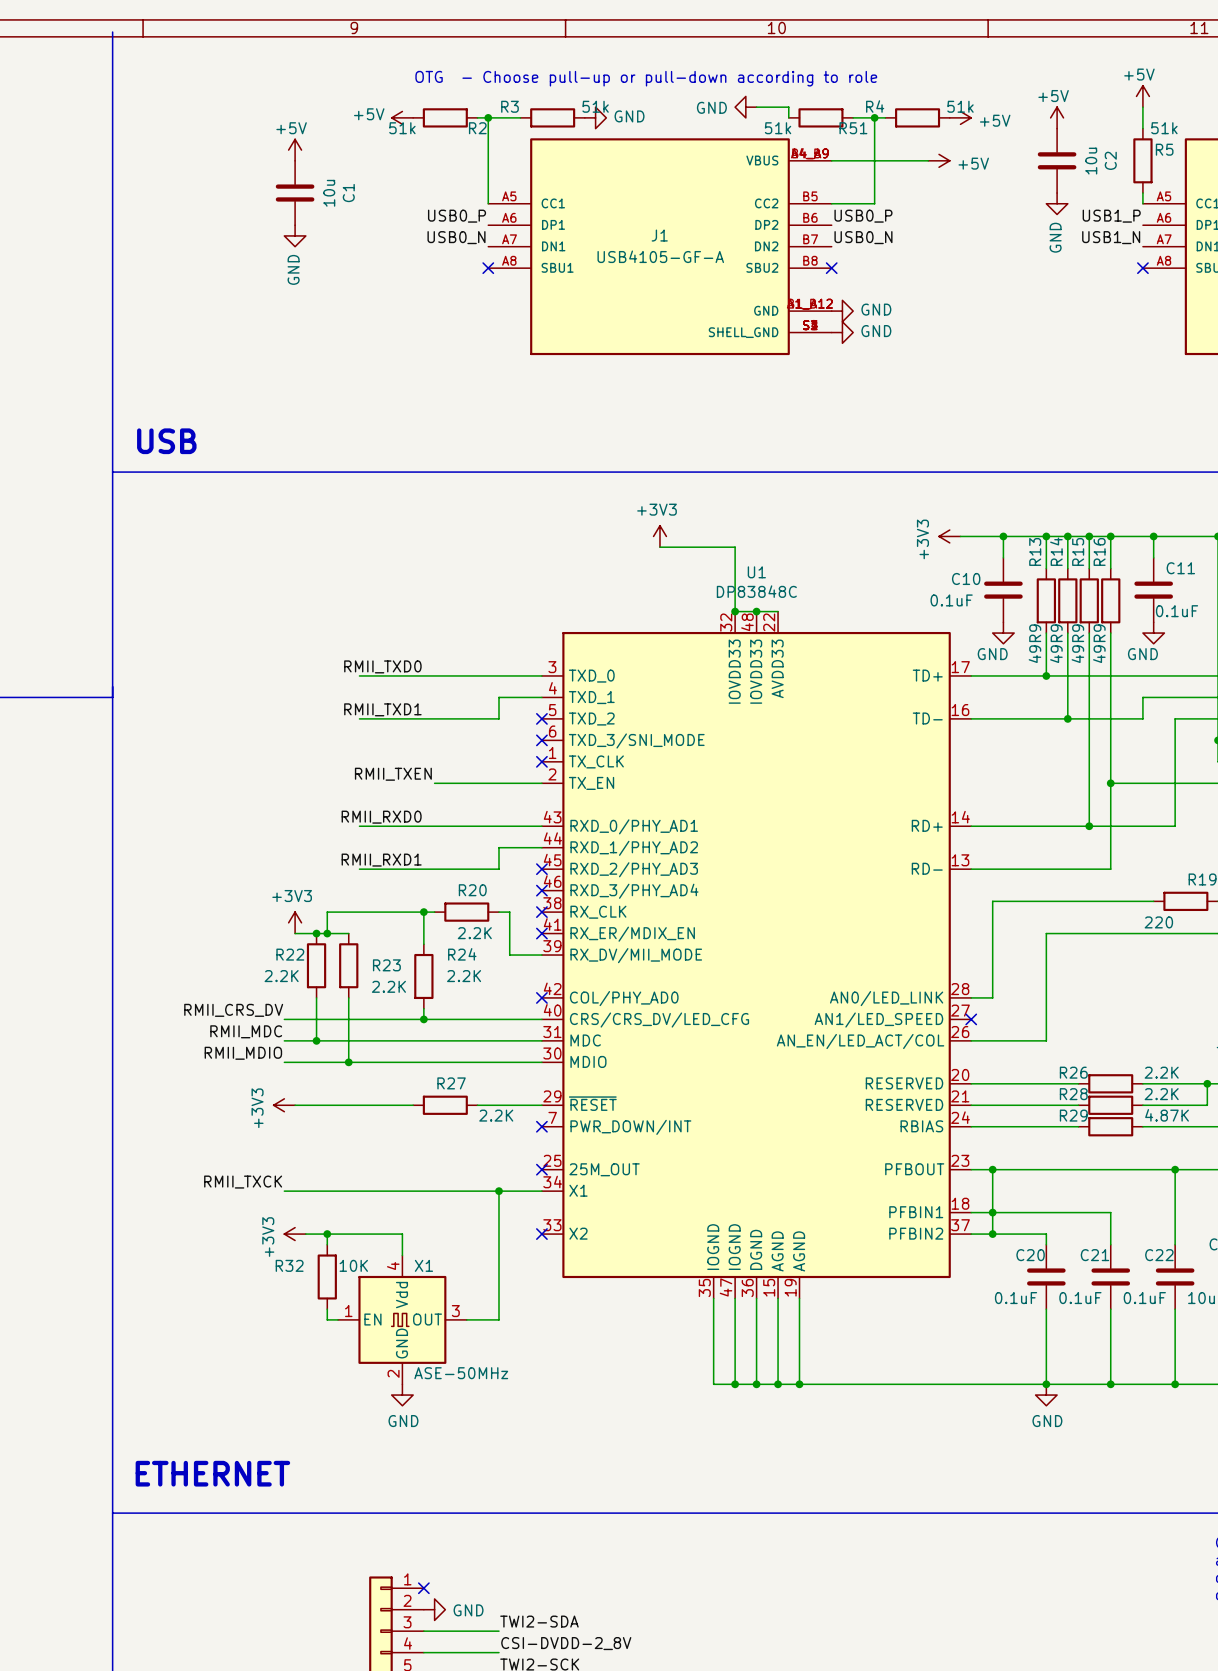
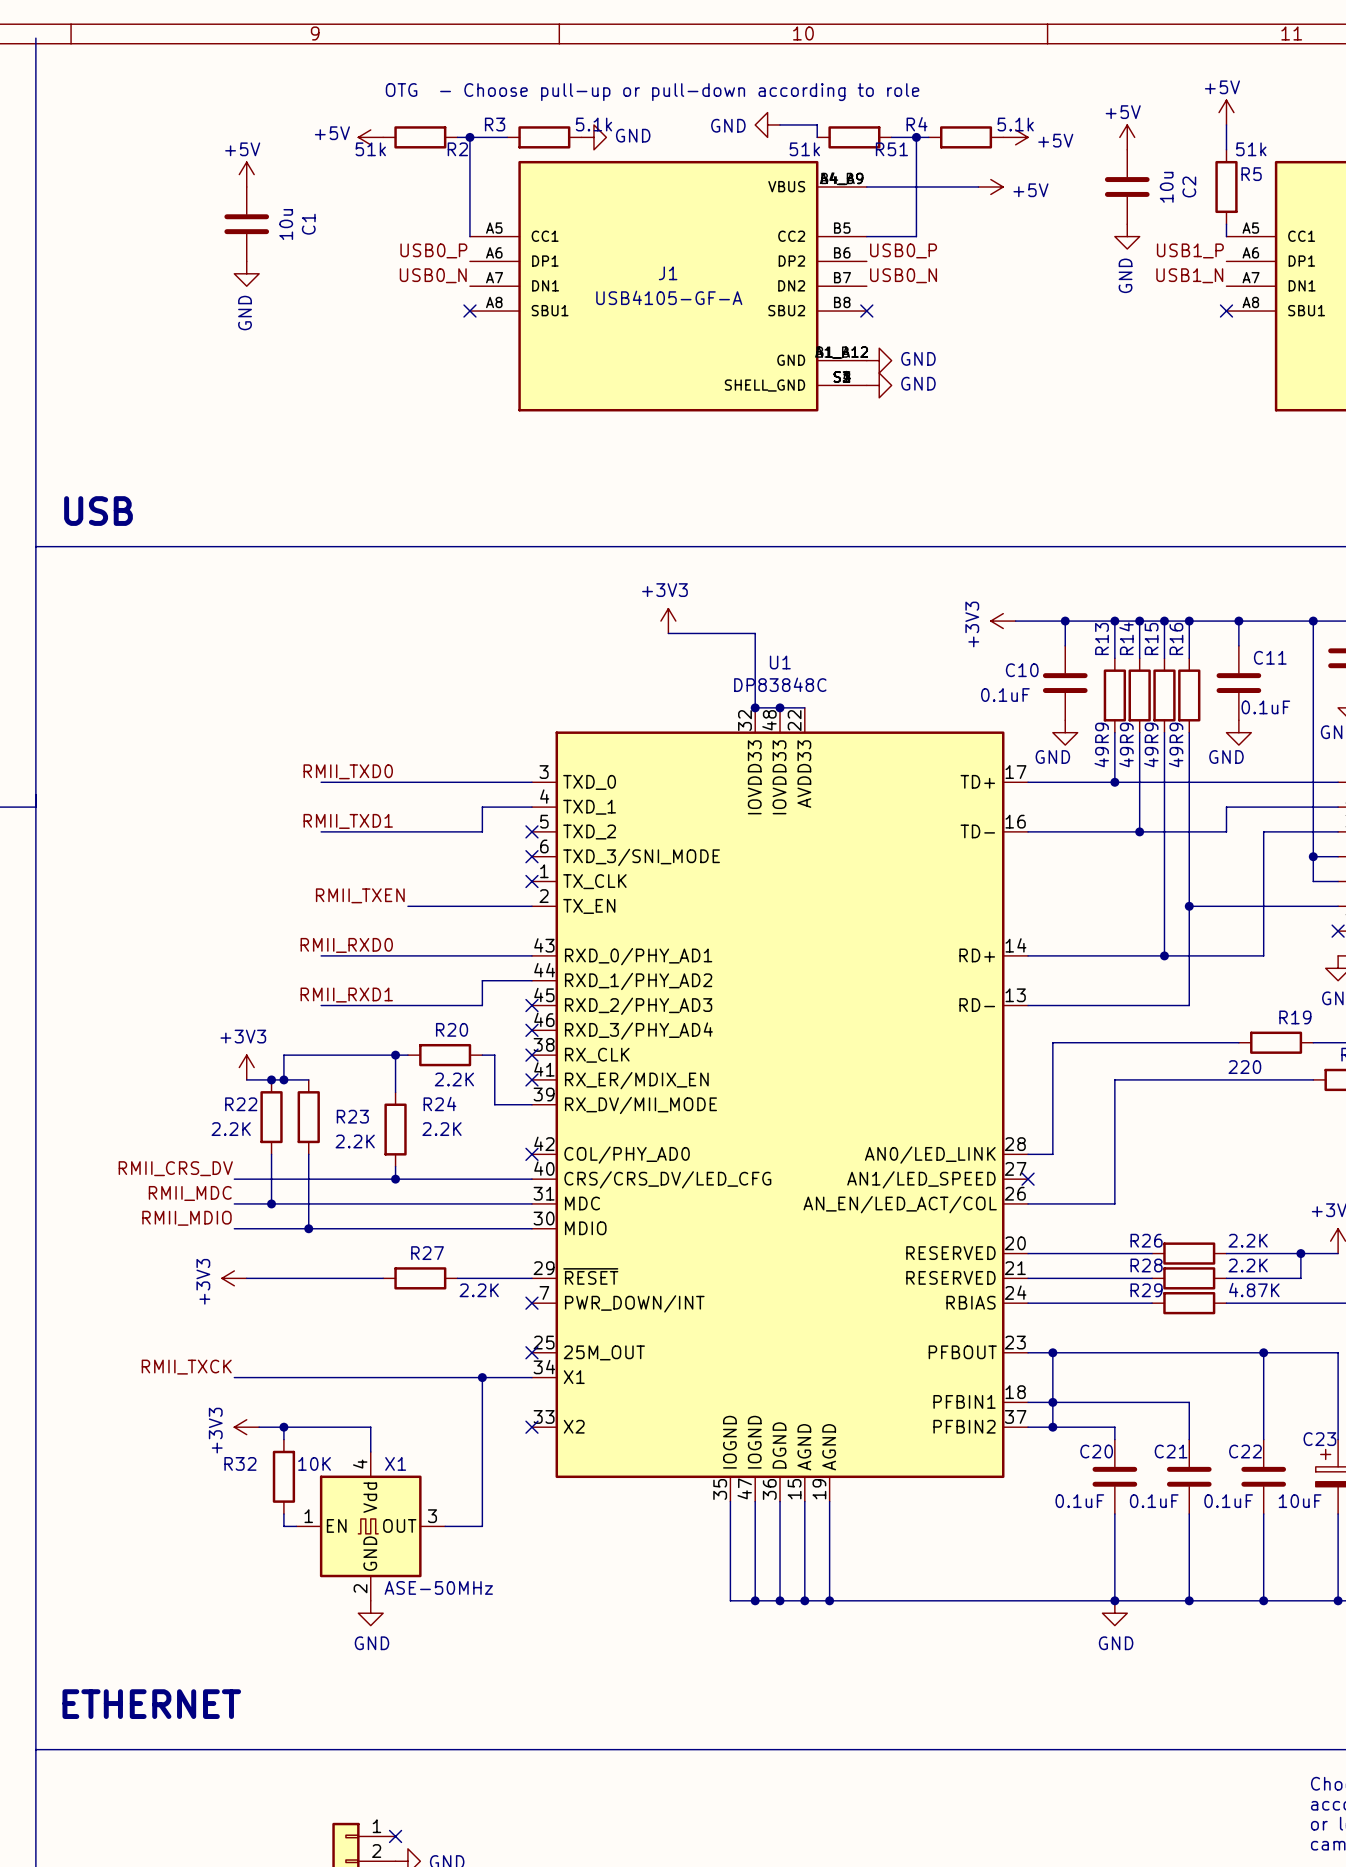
R3 value: 51k (595, 106) -> 5.1k (593, 124)
R4 value: 51k (960, 106) -> 5.1k (1015, 124)

